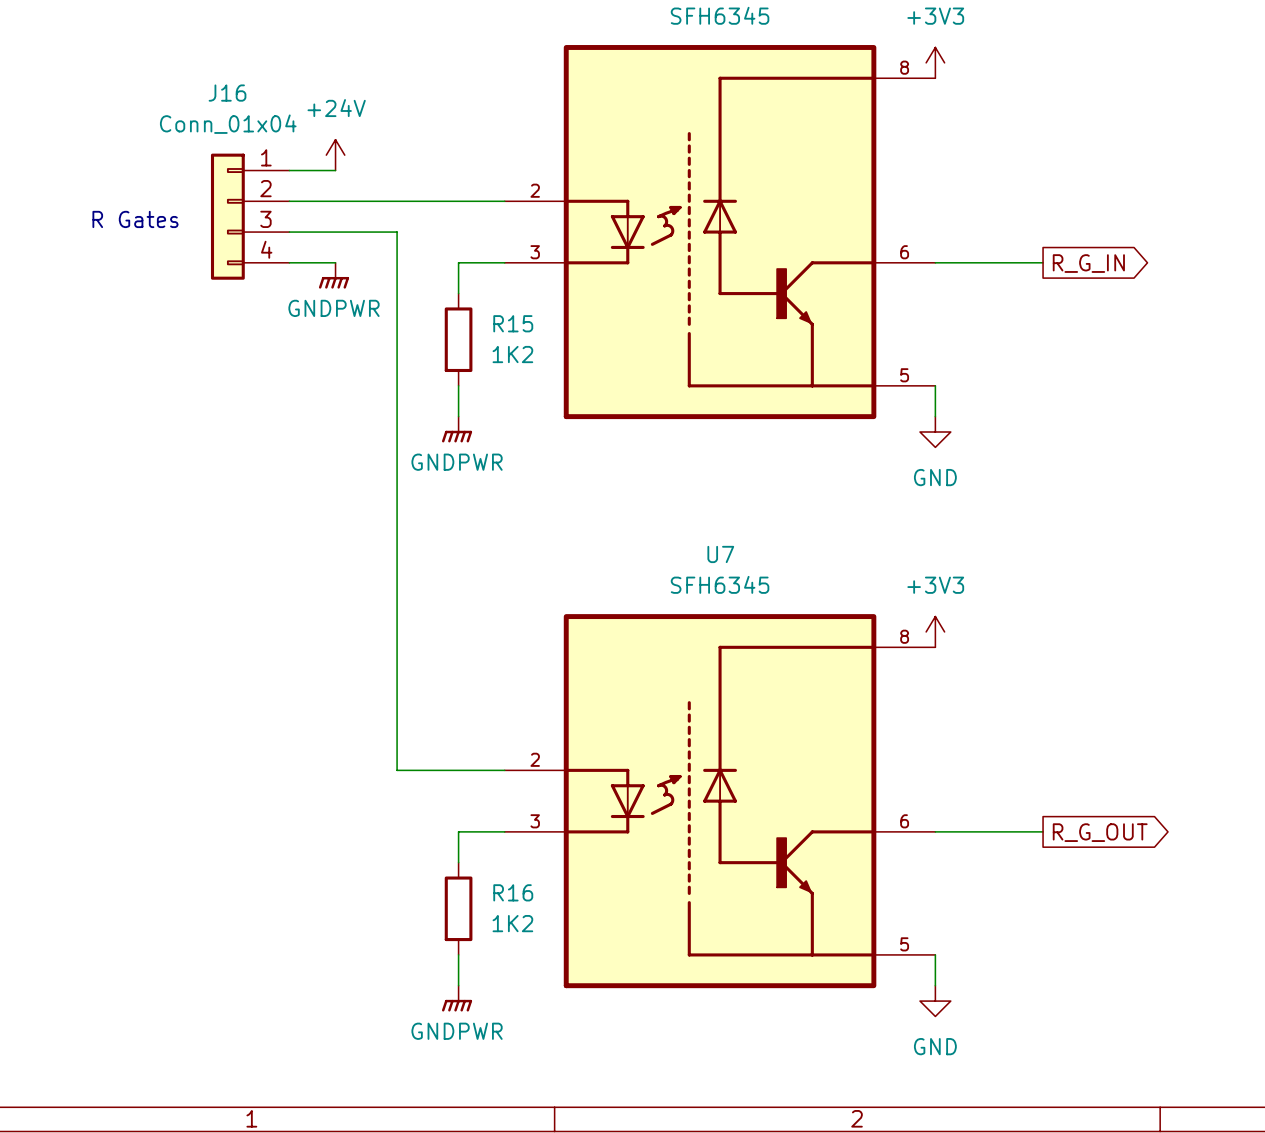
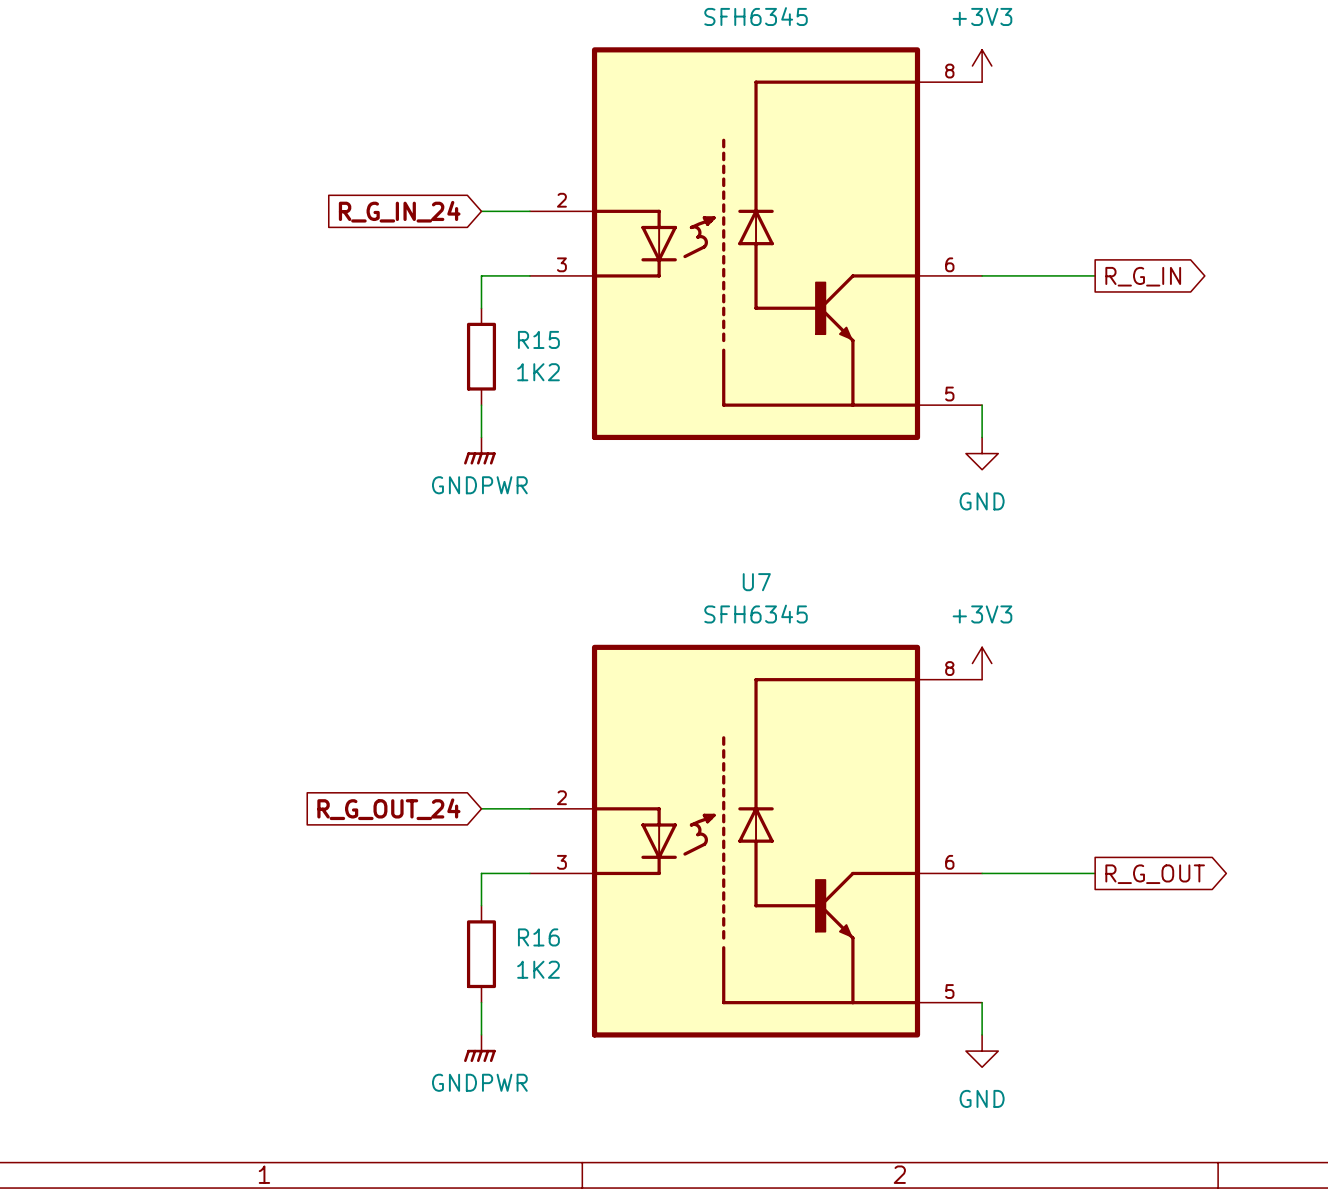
power symbol: +24V (335, 155) -> none
wire: (289, 170) (335, 170) -> none
wire: (289, 201) (458, 201) -> none
global label: none -> R_G_IN_24 (399, 211)
J16: Conn_01x04 (250, 216) -> none
text: R Gates (135, 219) -> none
wire: (289, 232) (397, 232) (397, 770) (458, 770) -> none
wire: (289, 262) (335, 262) -> none
power symbol: GNDPWR (334, 275) -> none
global label: none -> R_G_OUT_24 (388, 809)

